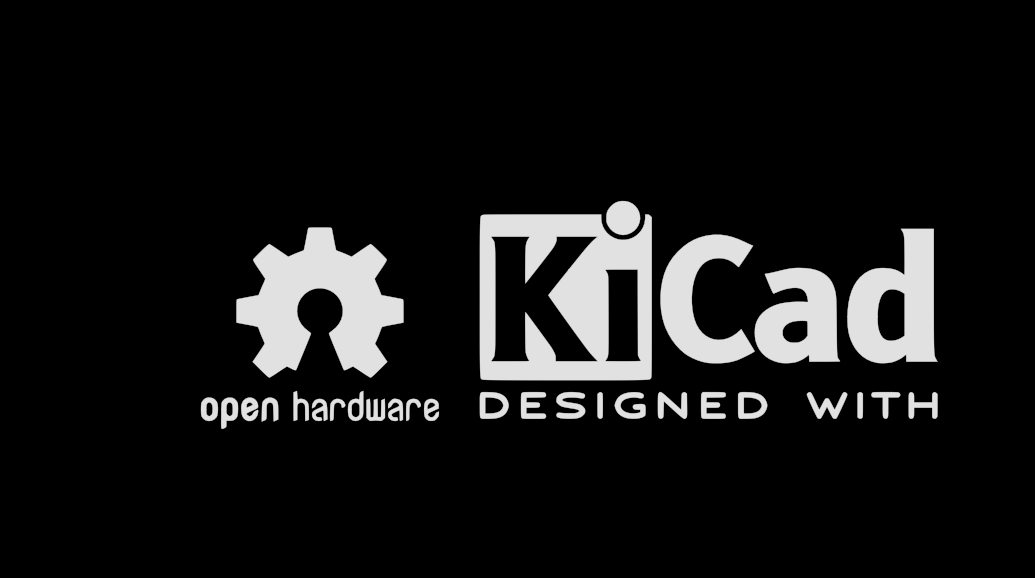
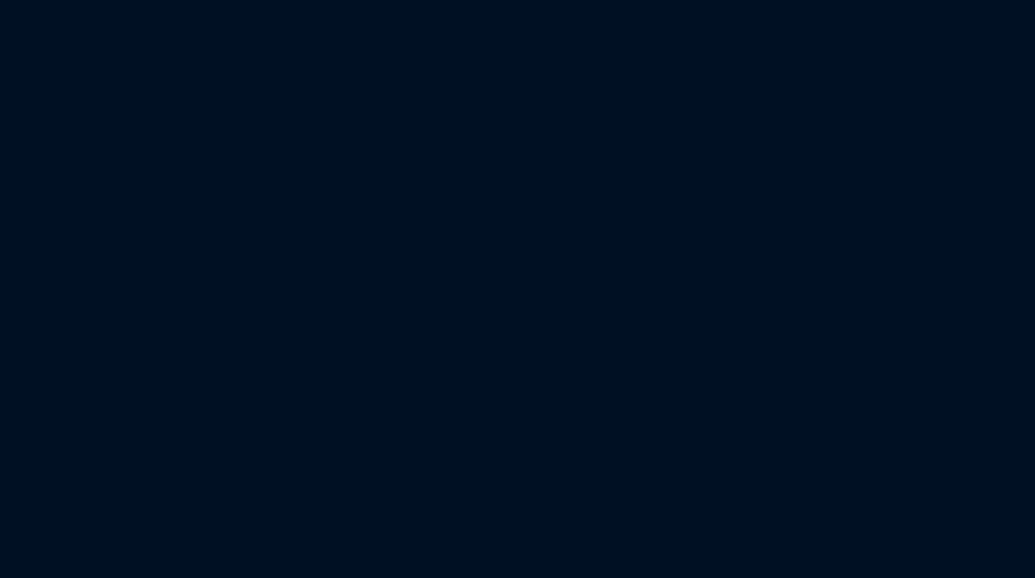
drawing: [200, 200, 938, 430] -> none

